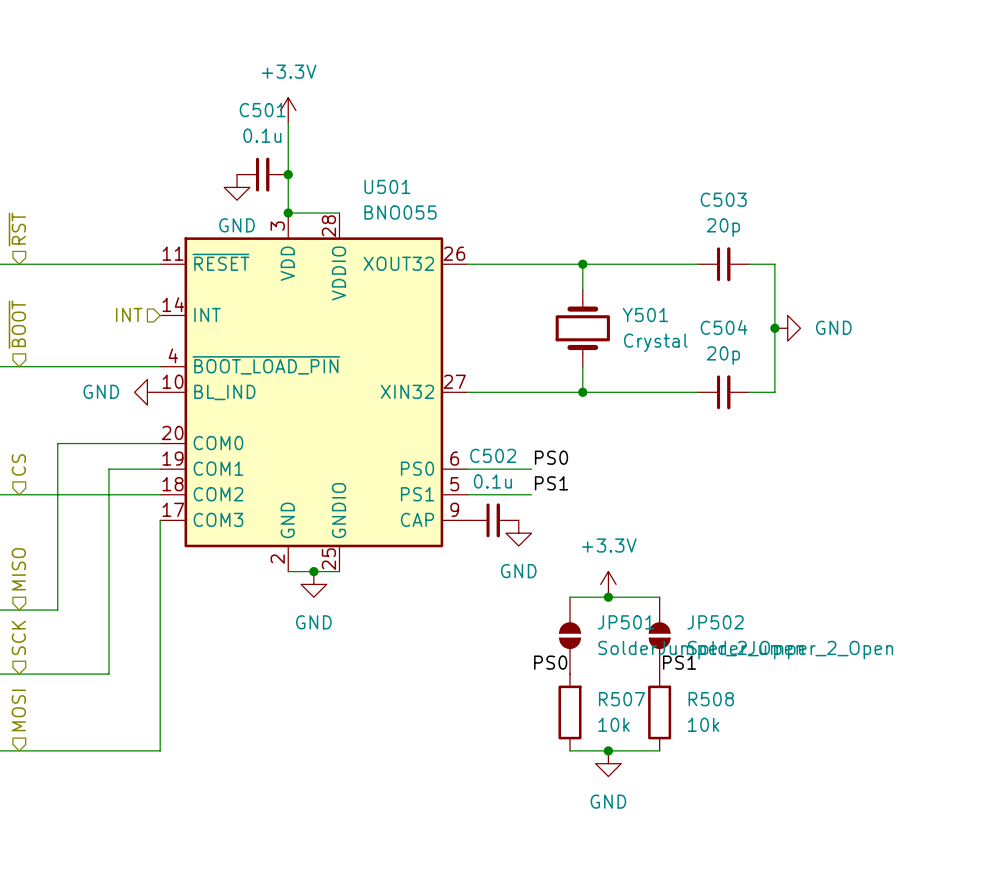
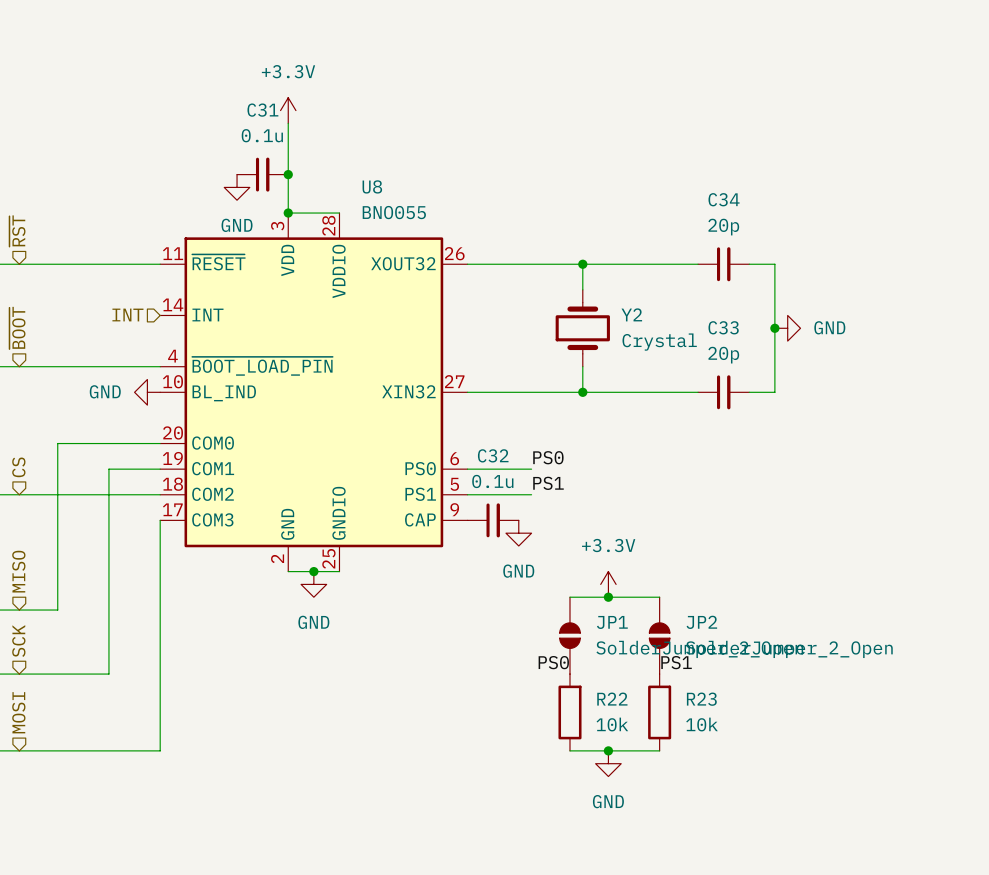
C501 name: C501 (262, 110) -> C31 (262, 110)
U501 name: U501 (387, 186) -> U8 (372, 186)
C503 name: C503 (723, 199) -> C34 (724, 199)
Y501 name: Y501 (645, 314) -> Y2 (631, 314)
C504 name: C504 (724, 327) -> C33 (723, 327)
C502 name: C502 (493, 455) -> C32 (493, 455)
JP501 name: JP501 (625, 622) -> JP1 (612, 622)
JP502 name: JP502 (715, 622) -> JP2 (701, 622)
R507 name: R507 (621, 699) -> R22 (612, 699)
R508 name: R508 (711, 699) -> R23 (701, 699)

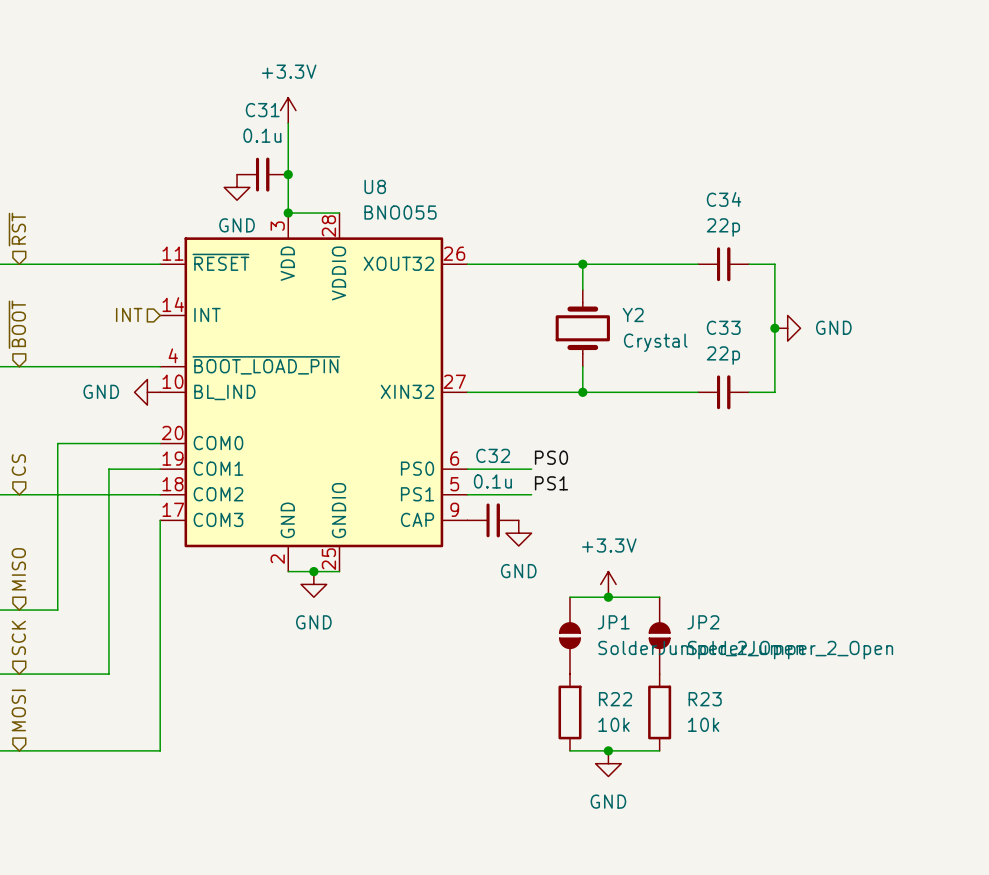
C34 value: 20p (723, 227) -> 22p (723, 227)
C33 value: 20p (723, 355) -> 22p (723, 355)
label: PS0 (553, 662) -> none
label: PS1 (676, 662) -> none

